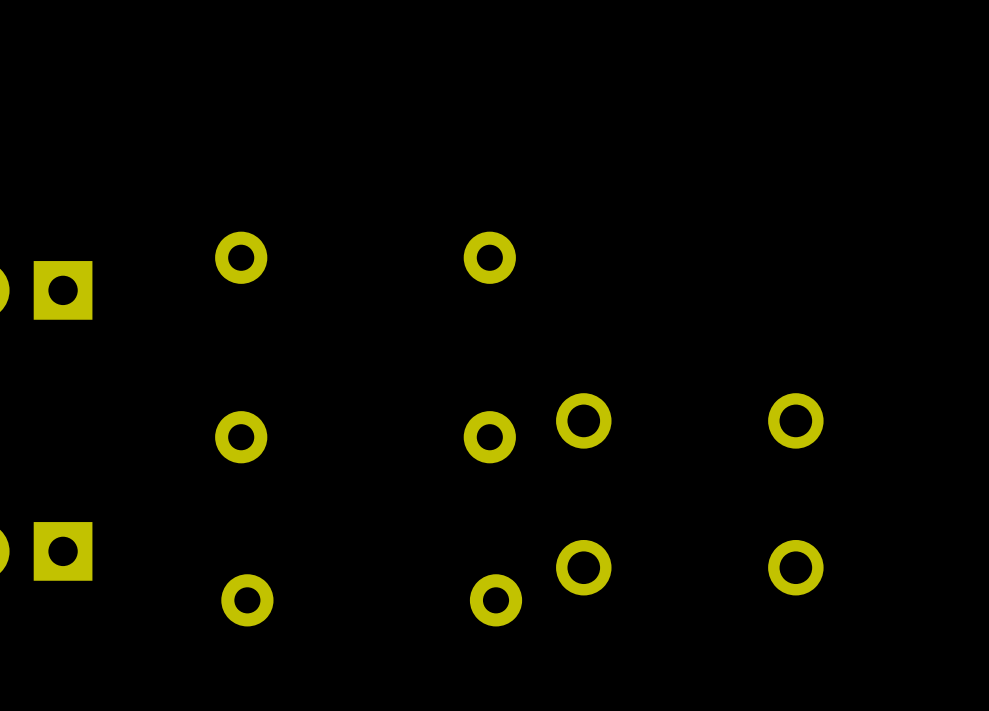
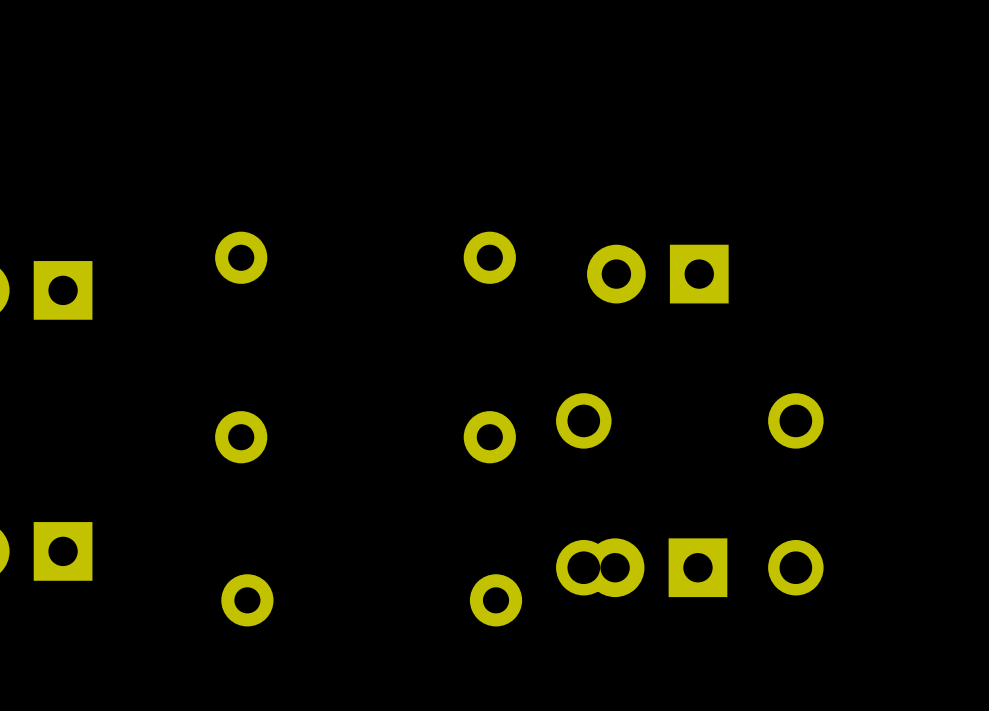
part: none -> (657, 274)
part: none -> (656, 567)

